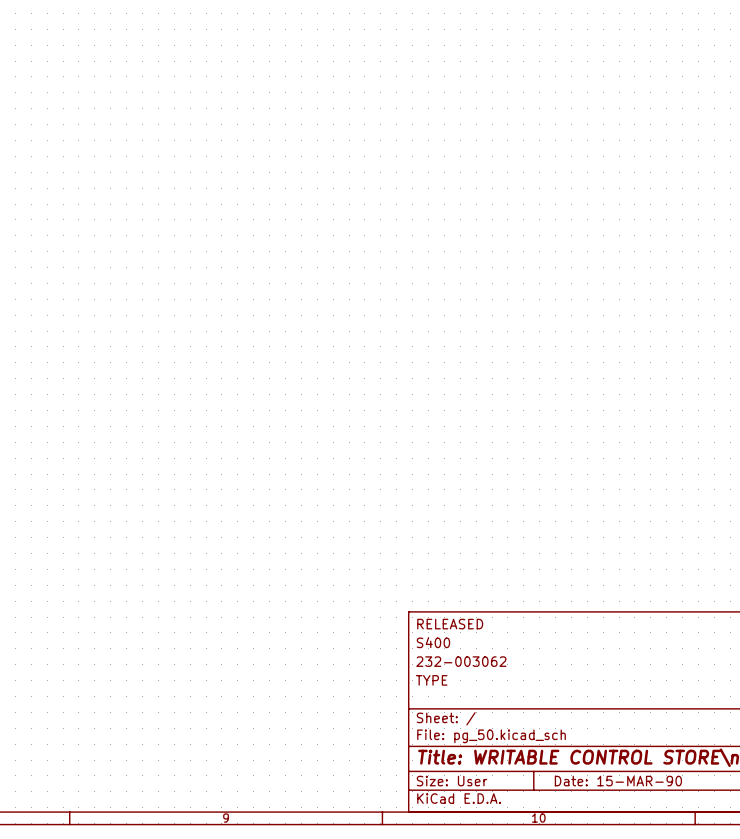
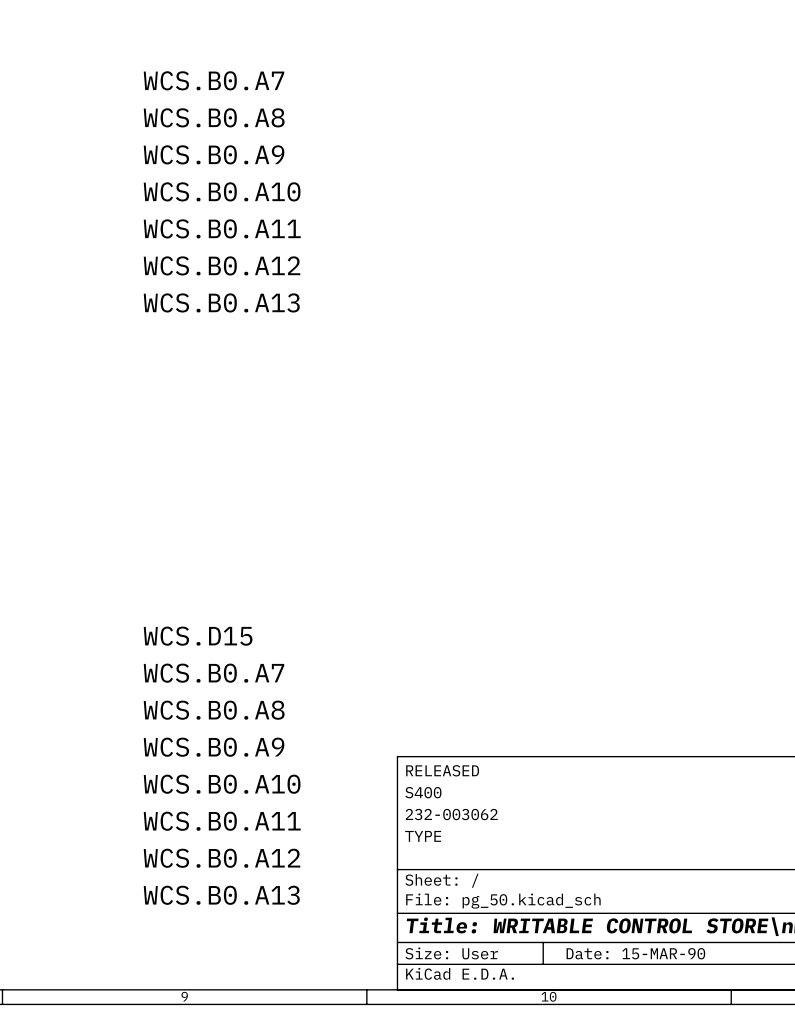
label: none -> WCS.B0.A7 (213, 80)
label: none -> WCS.B0.A8 (214, 117)
label: none -> WCS.B0.A9 (214, 154)
label: none -> WCS.B0.A10 (222, 191)
label: none -> WCS.B0.A11 (222, 228)
label: none -> WCS.B0.A12 (222, 265)
label: none -> WCS.B0.A13 (221, 302)
label: none -> WCS.D15 (198, 636)
label: none -> WCS.B0.A7 (213, 673)
label: none -> WCS.B0.A8 (214, 710)
label: none -> WCS.B0.A9 (214, 747)
label: none -> WCS.B0.A10 (222, 784)
label: none -> WCS.B0.A11 (222, 821)
label: none -> WCS.B0.A12 (222, 858)
label: none -> WCS.B0.A13 (221, 895)

